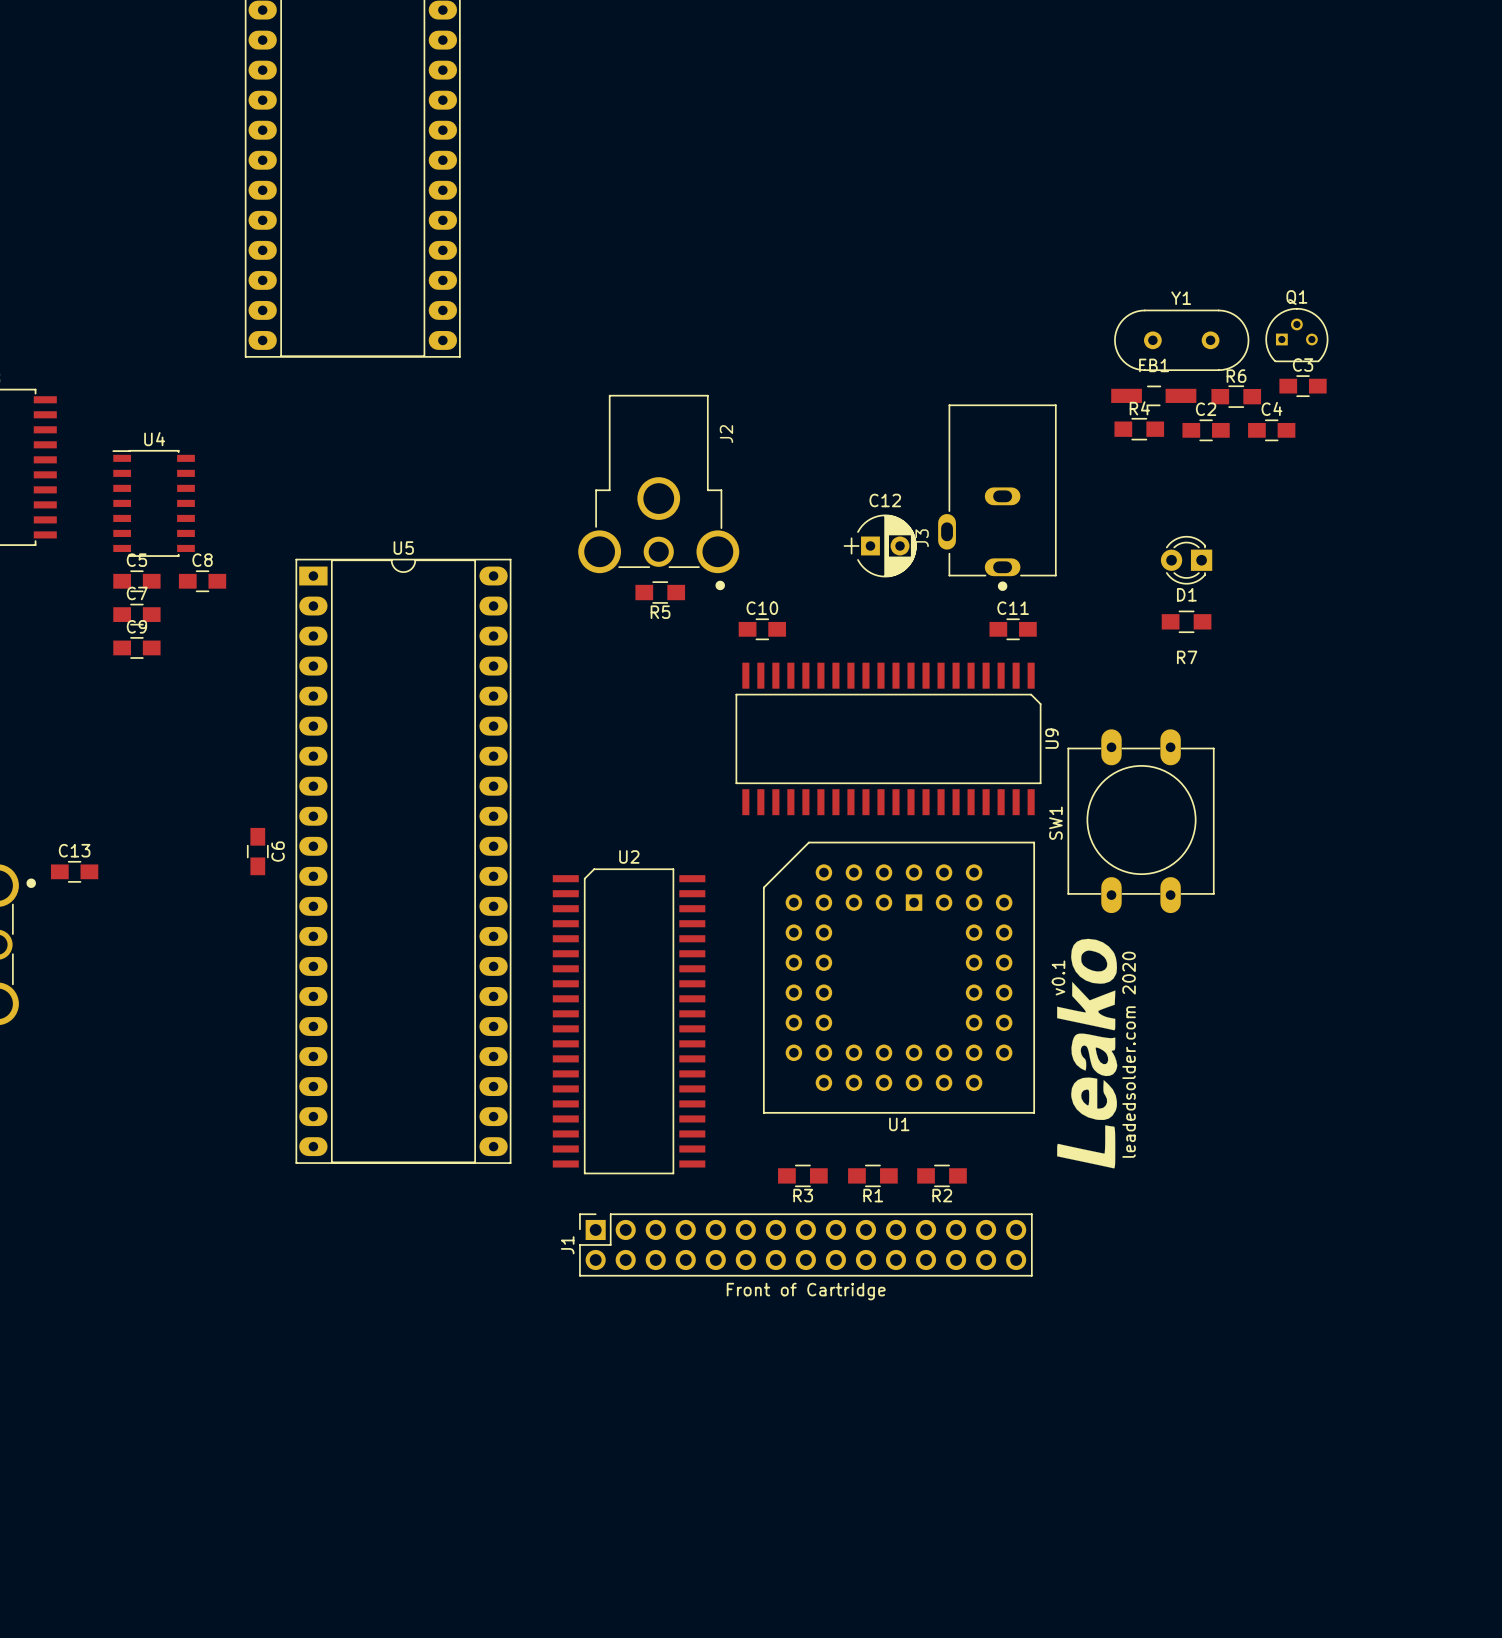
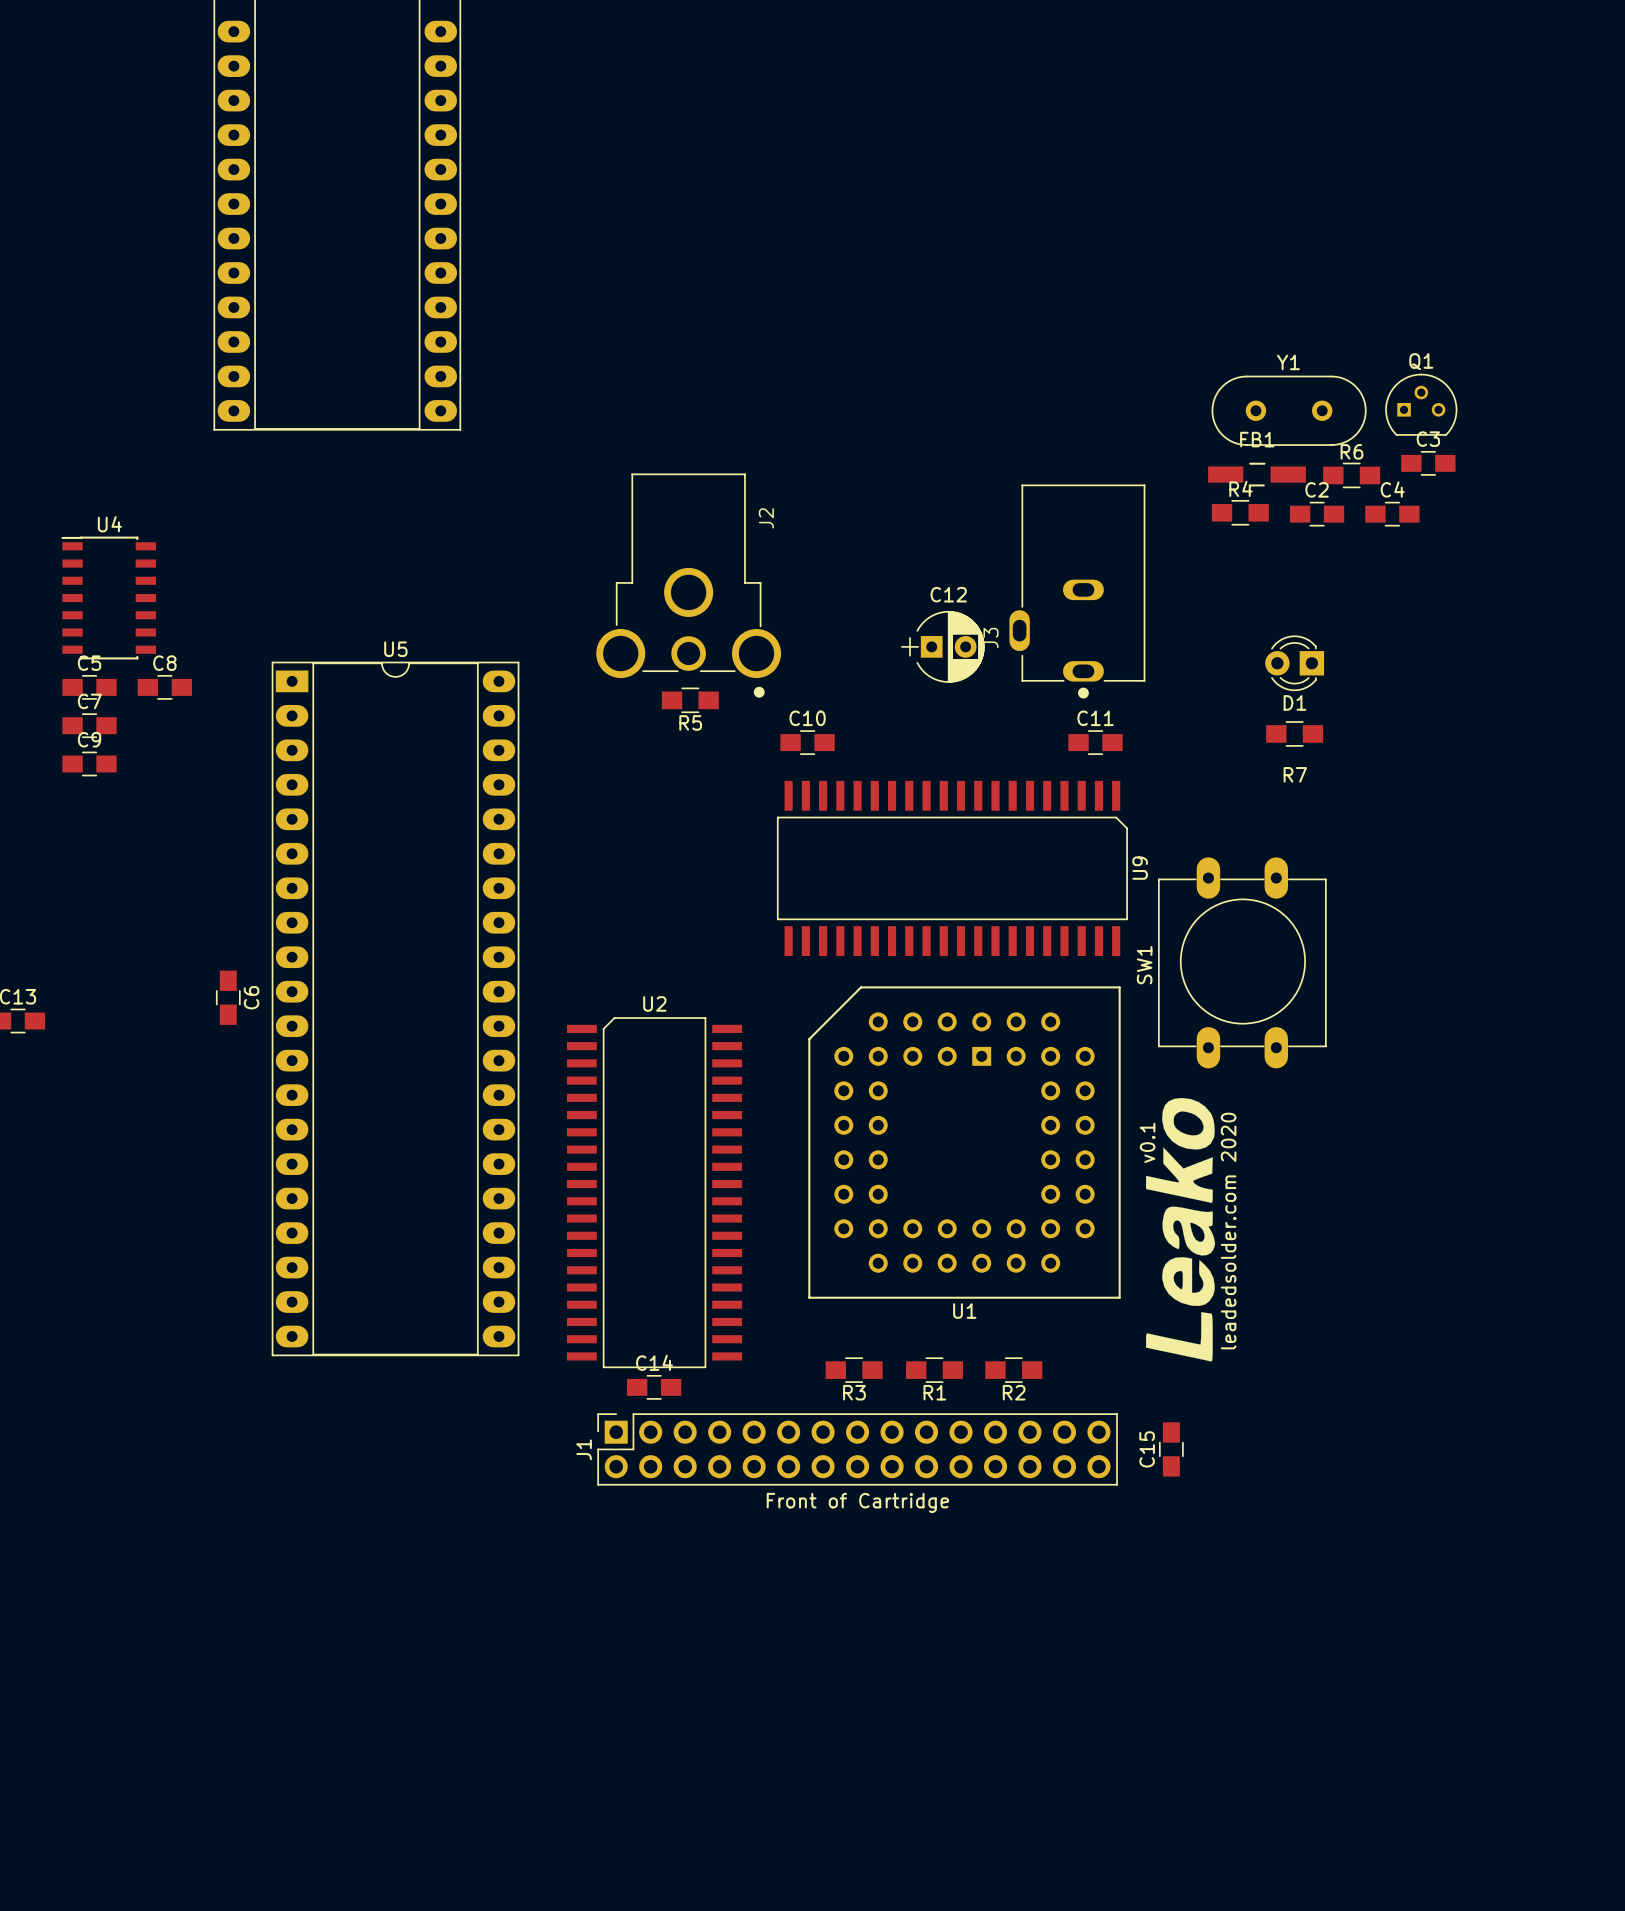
C14: none -> (654, 1387)
C15: none -> (1171, 1449)

